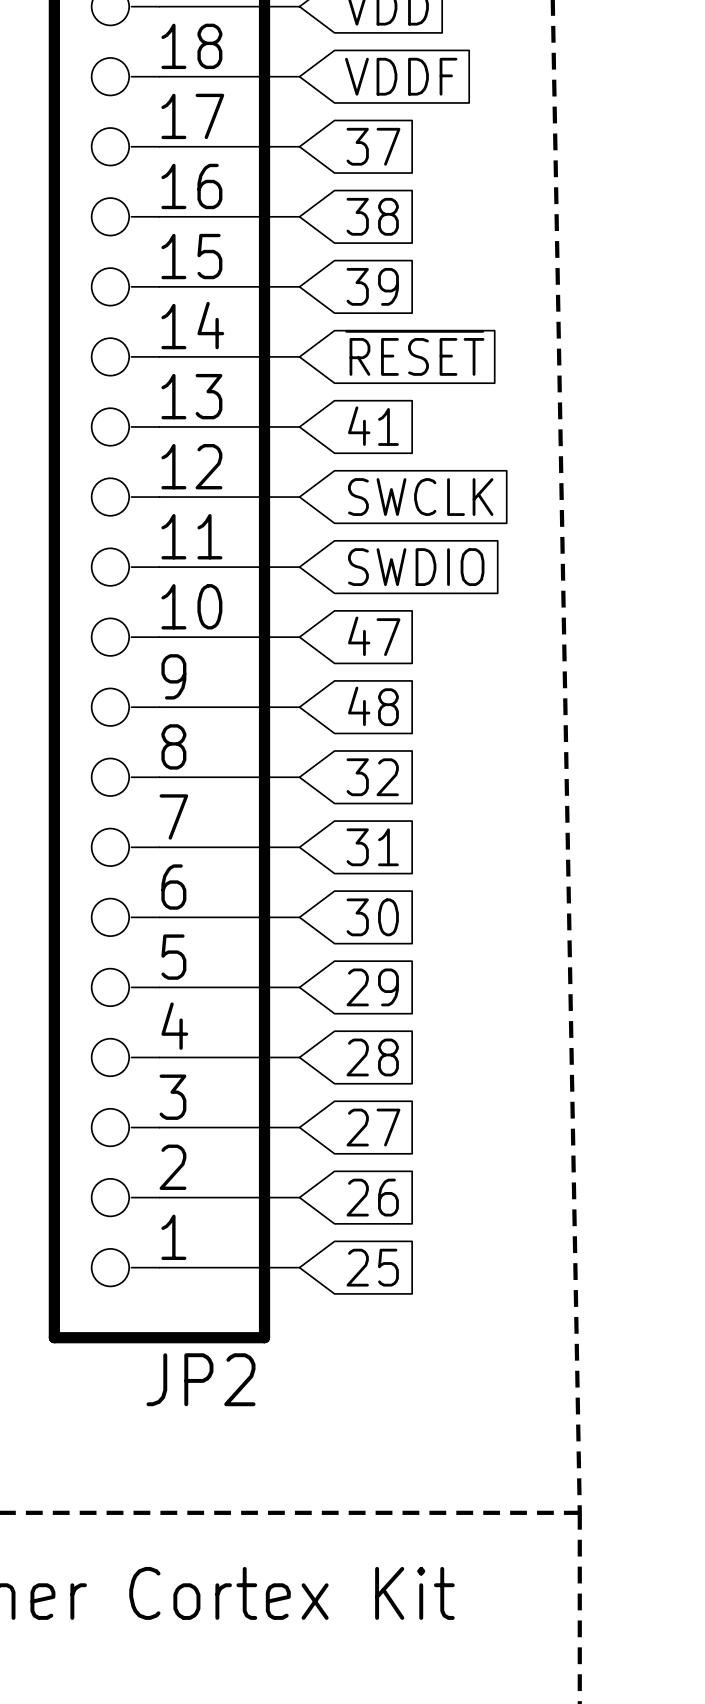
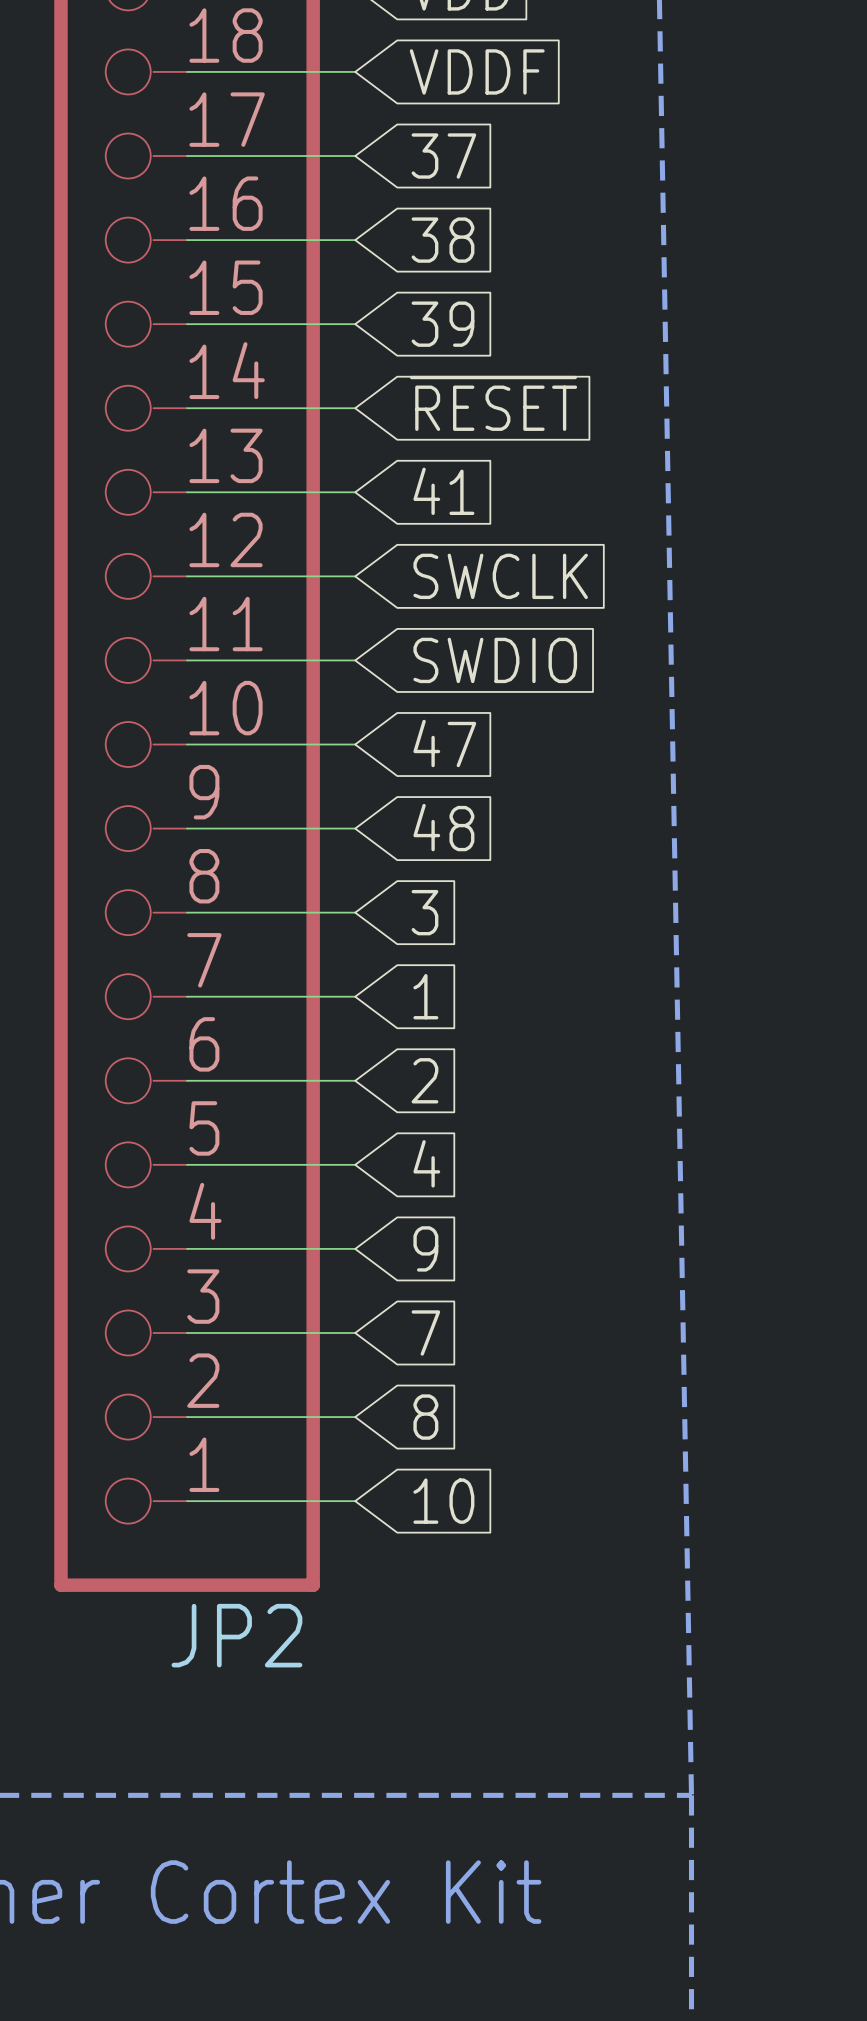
global label: 32 (372, 777) -> 3 (424, 912)
global label: 31 (372, 847) -> 1 (425, 996)
global label: 30 (372, 917) -> 2 (424, 1080)
global label: 29 (372, 987) -> 4 (426, 1163)
global label: 28 (372, 1057) -> 9 (425, 1248)
global label: 27 (373, 1127) -> 7 (425, 1332)
global label: 26 (372, 1197) -> 8 (425, 1417)
global label: 25 (372, 1267) -> 10 (443, 1501)

